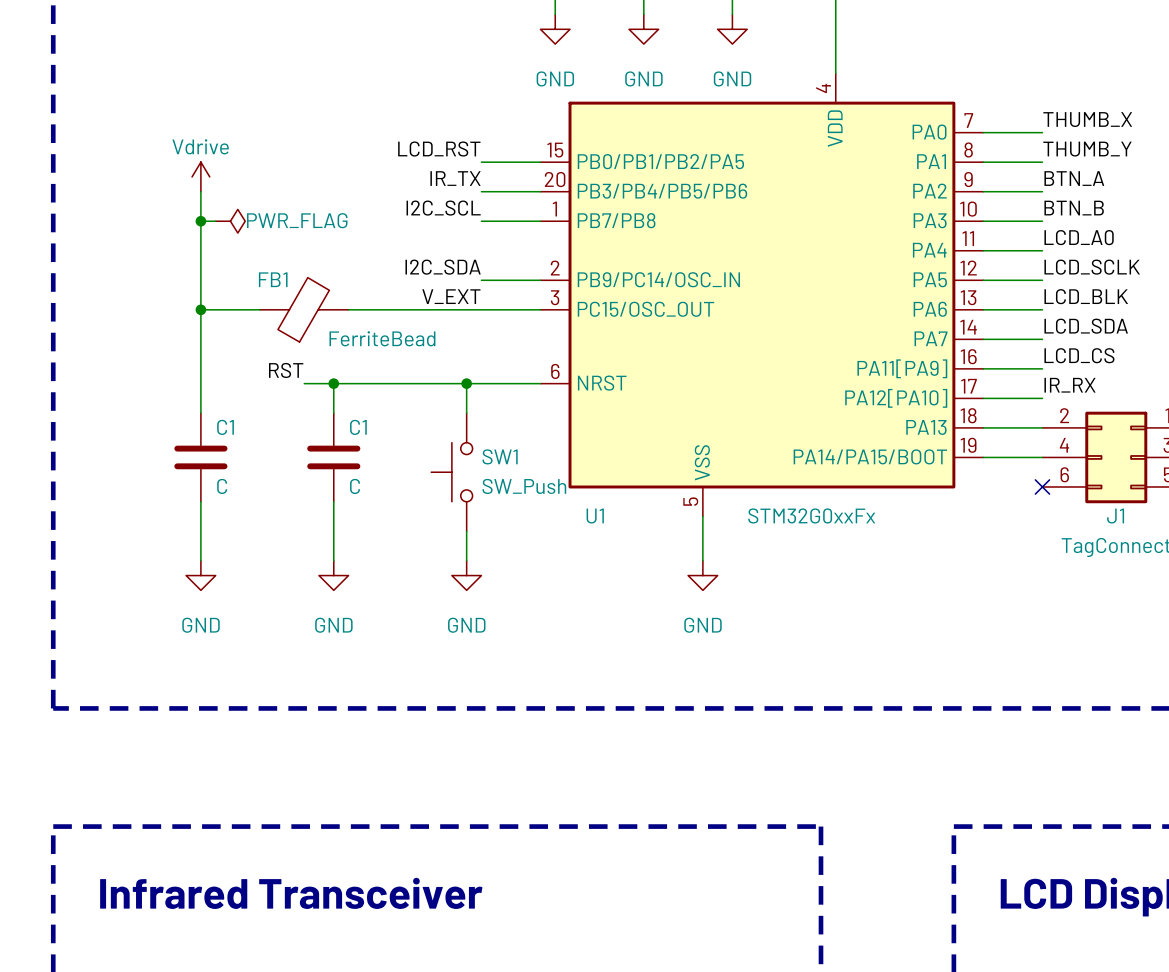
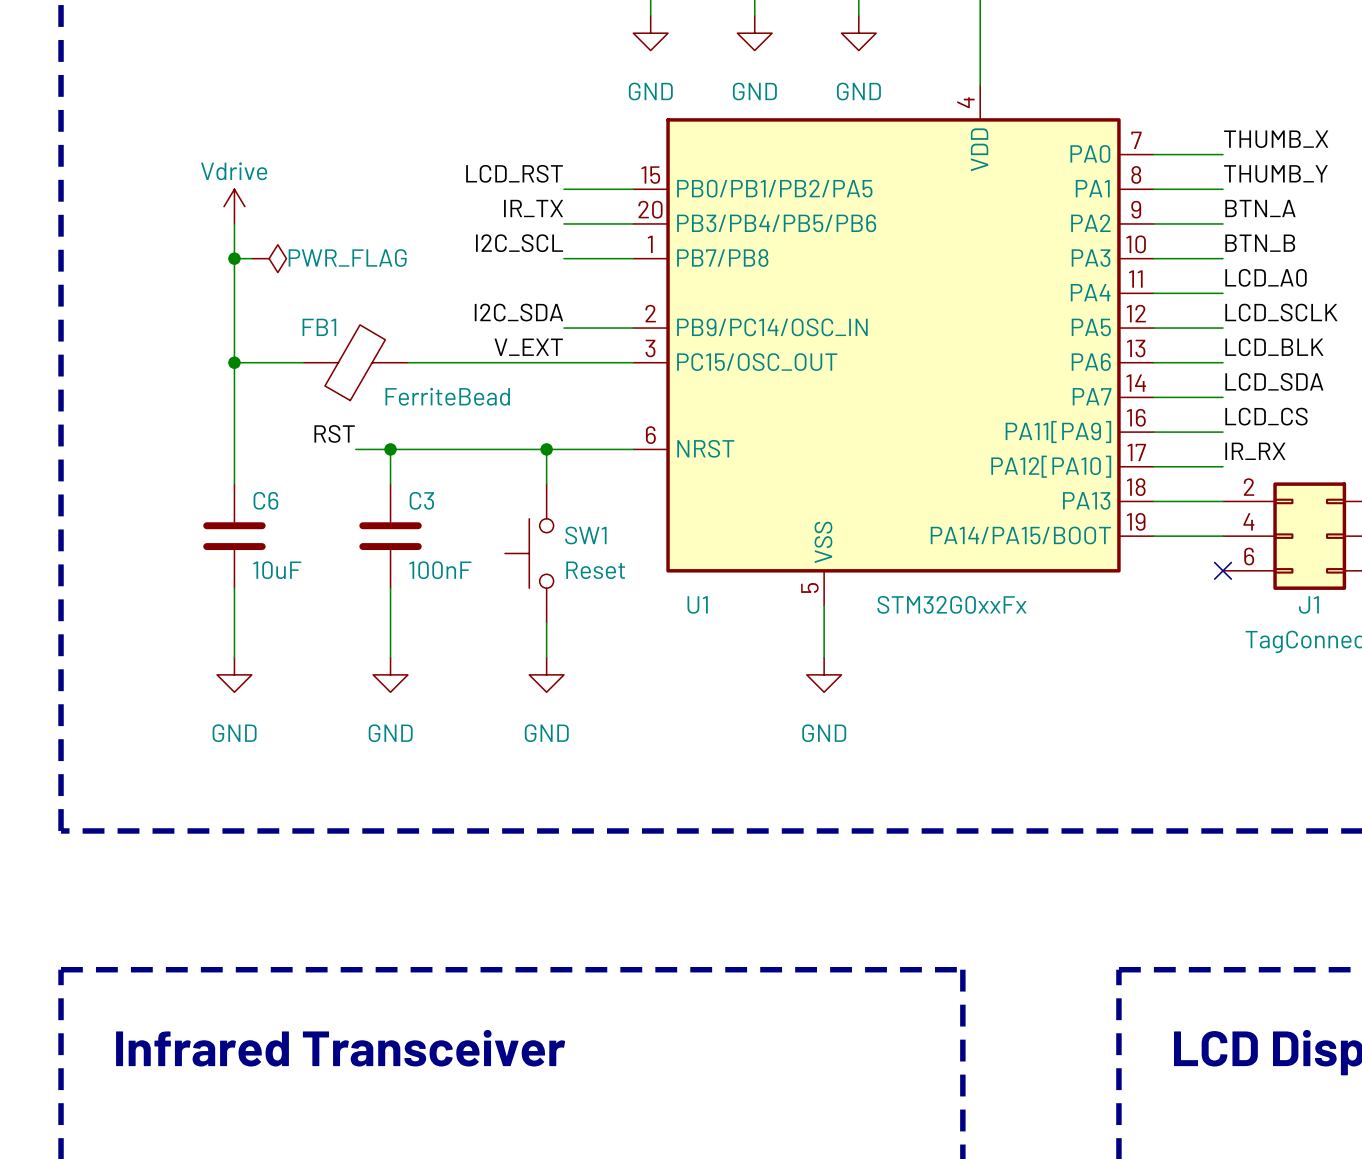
C1 name: C1 (225, 427) -> C6 (265, 500)
C1 name: C1 (358, 427) -> C3 (421, 500)
C1 value: C (222, 486) -> 10uF (277, 570)
C1 value: C (355, 486) -> 100nF (440, 570)
SW1 value: SW_Push (524, 486) -> Reset (595, 570)

